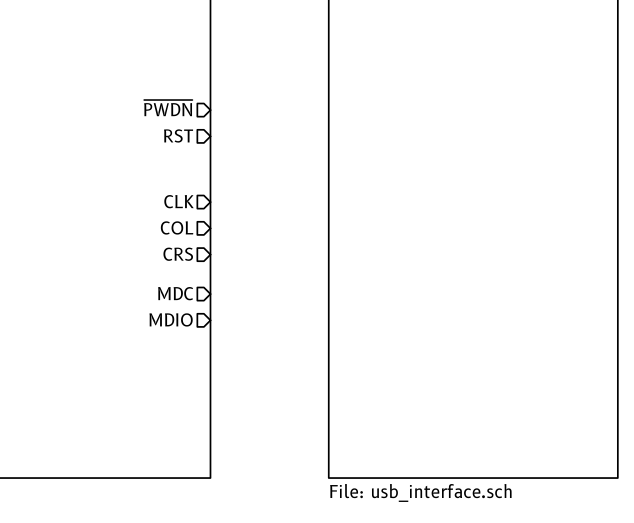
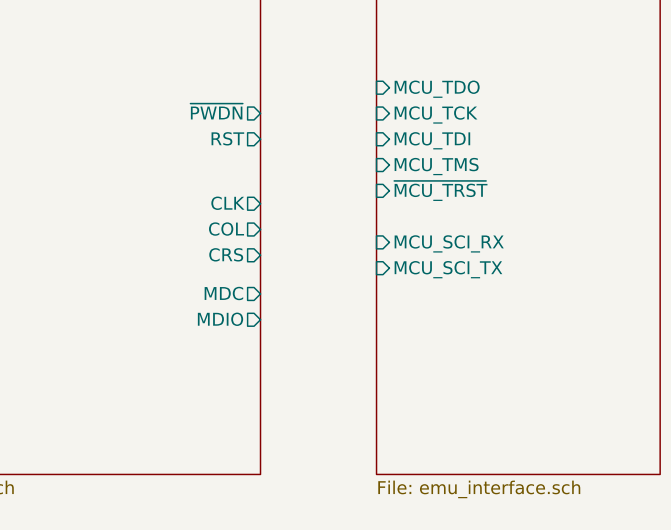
sheet pin: none -> MCU_TDO (437, 89)
sheet pin: none -> MCU_TCK (436, 114)
sheet pin: none -> MCU_TDI (432, 140)
sheet pin: none -> MCU_TMS (436, 166)
sheet pin: none -> ~{MCU_TRST} (440, 190)
sheet pin: none -> MCU_SCI_RX (449, 243)
sheet pin: none -> MCU_SCI_TX (448, 269)
sheet value: File: usb_interface.sch (420, 492) -> File: emu_interface.sch (479, 489)

